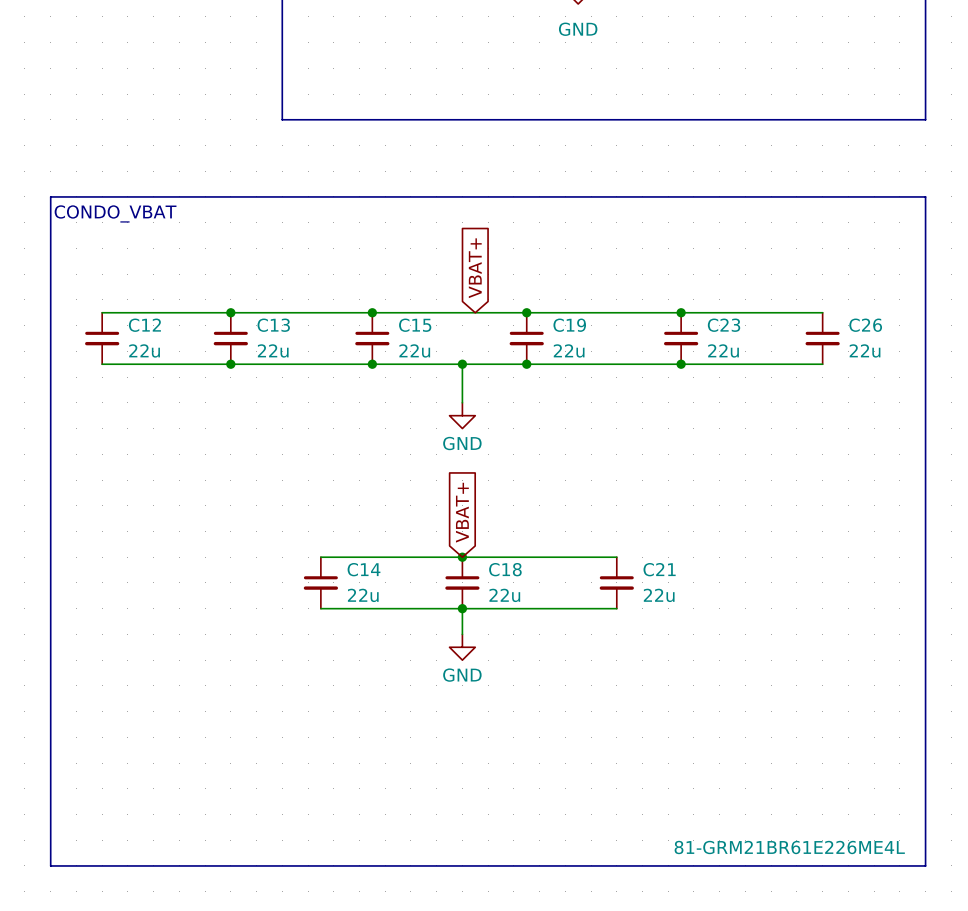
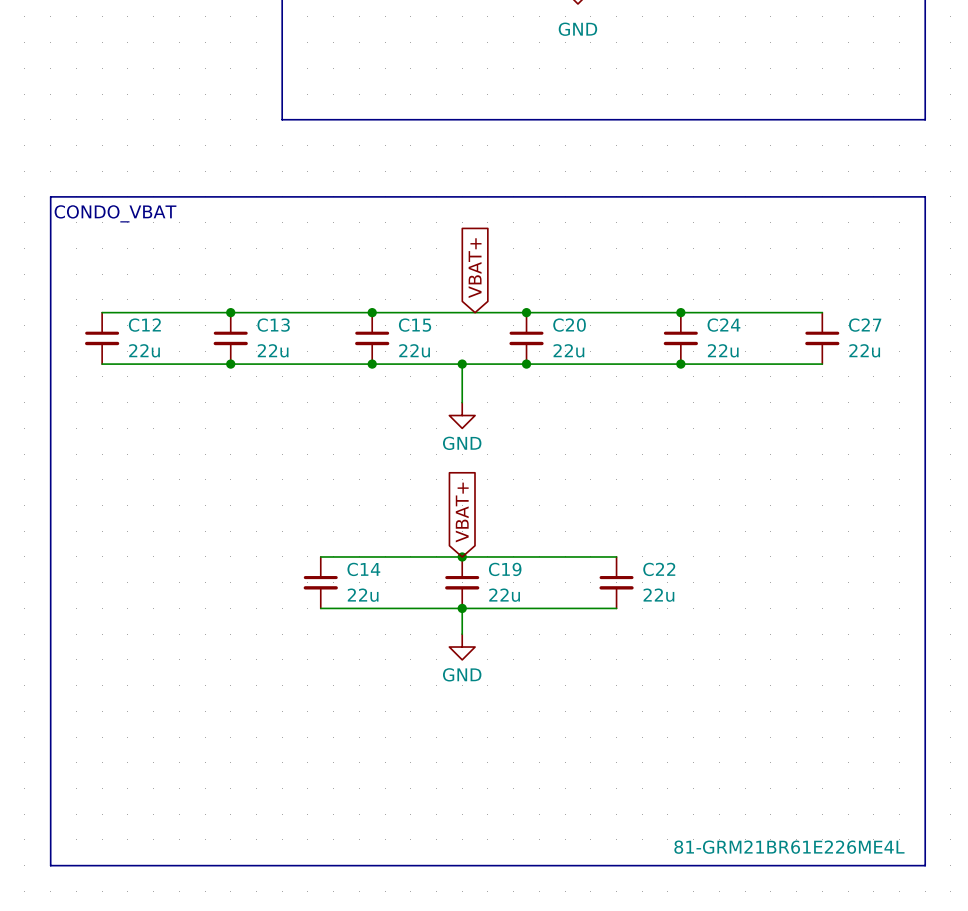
C19 name: C19 (569, 325) -> C20 (569, 325)
C23 name: C23 (724, 325) -> C24 (723, 325)
C26 name: C26 (865, 325) -> C27 (865, 325)
C18 name: C18 (505, 569) -> C19 (505, 569)
C21 name: C21 (659, 569) -> C22 (659, 569)

